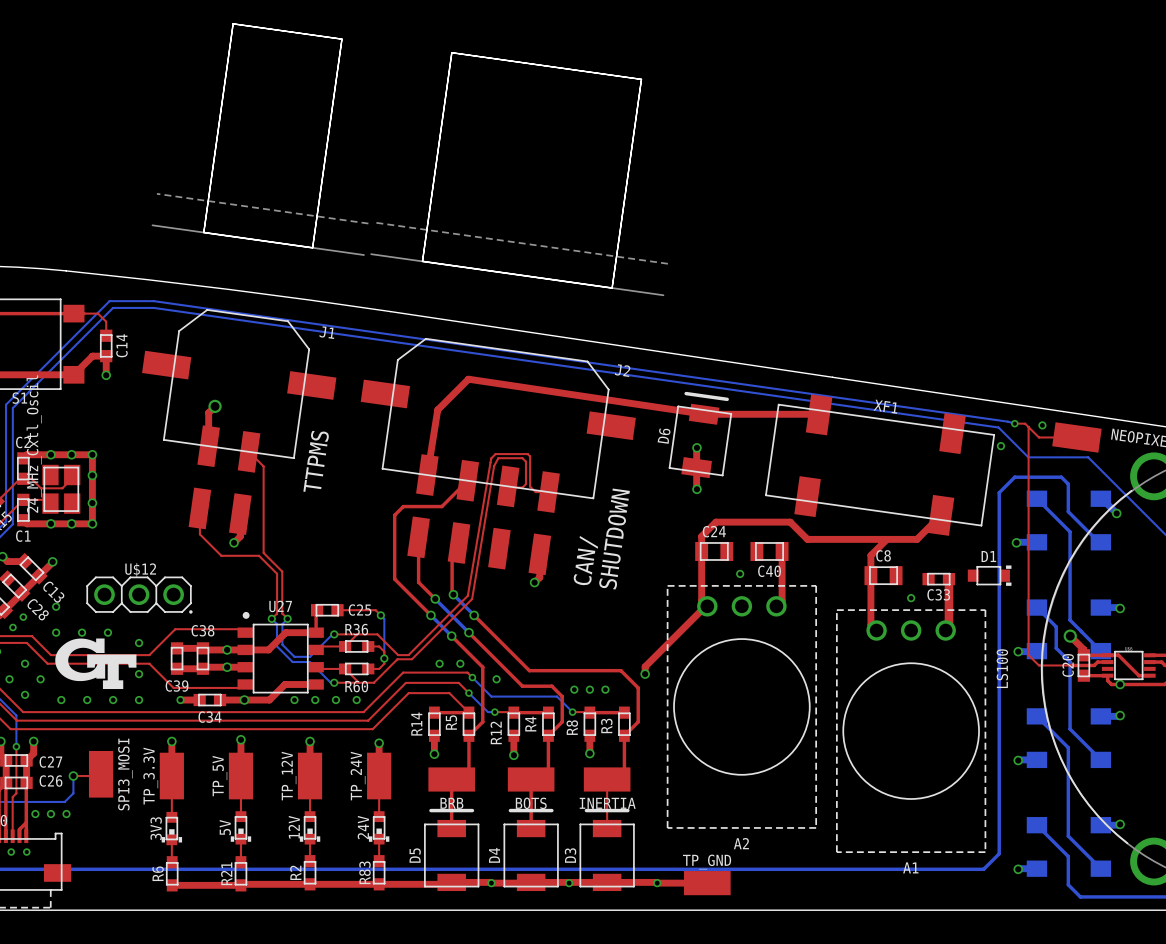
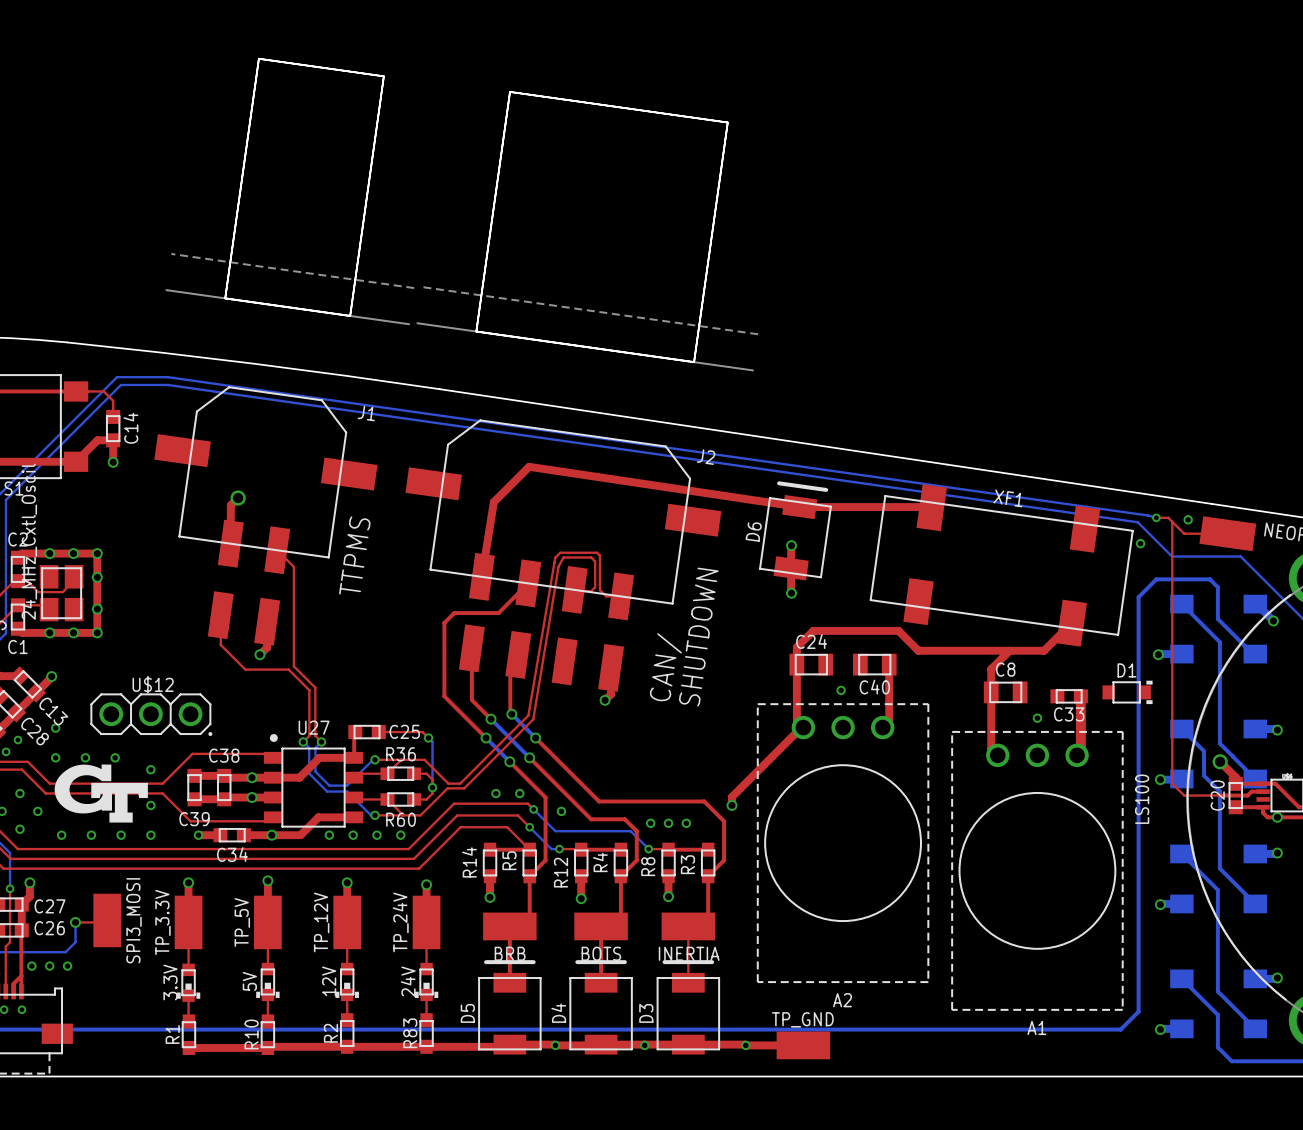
3V3 name: 3V3 (156, 828) -> 3.3V (170, 982)
R6 name: R6 (158, 873) -> R1 (172, 1034)
R21 name: R21 (226, 873) -> R10 (251, 1034)

